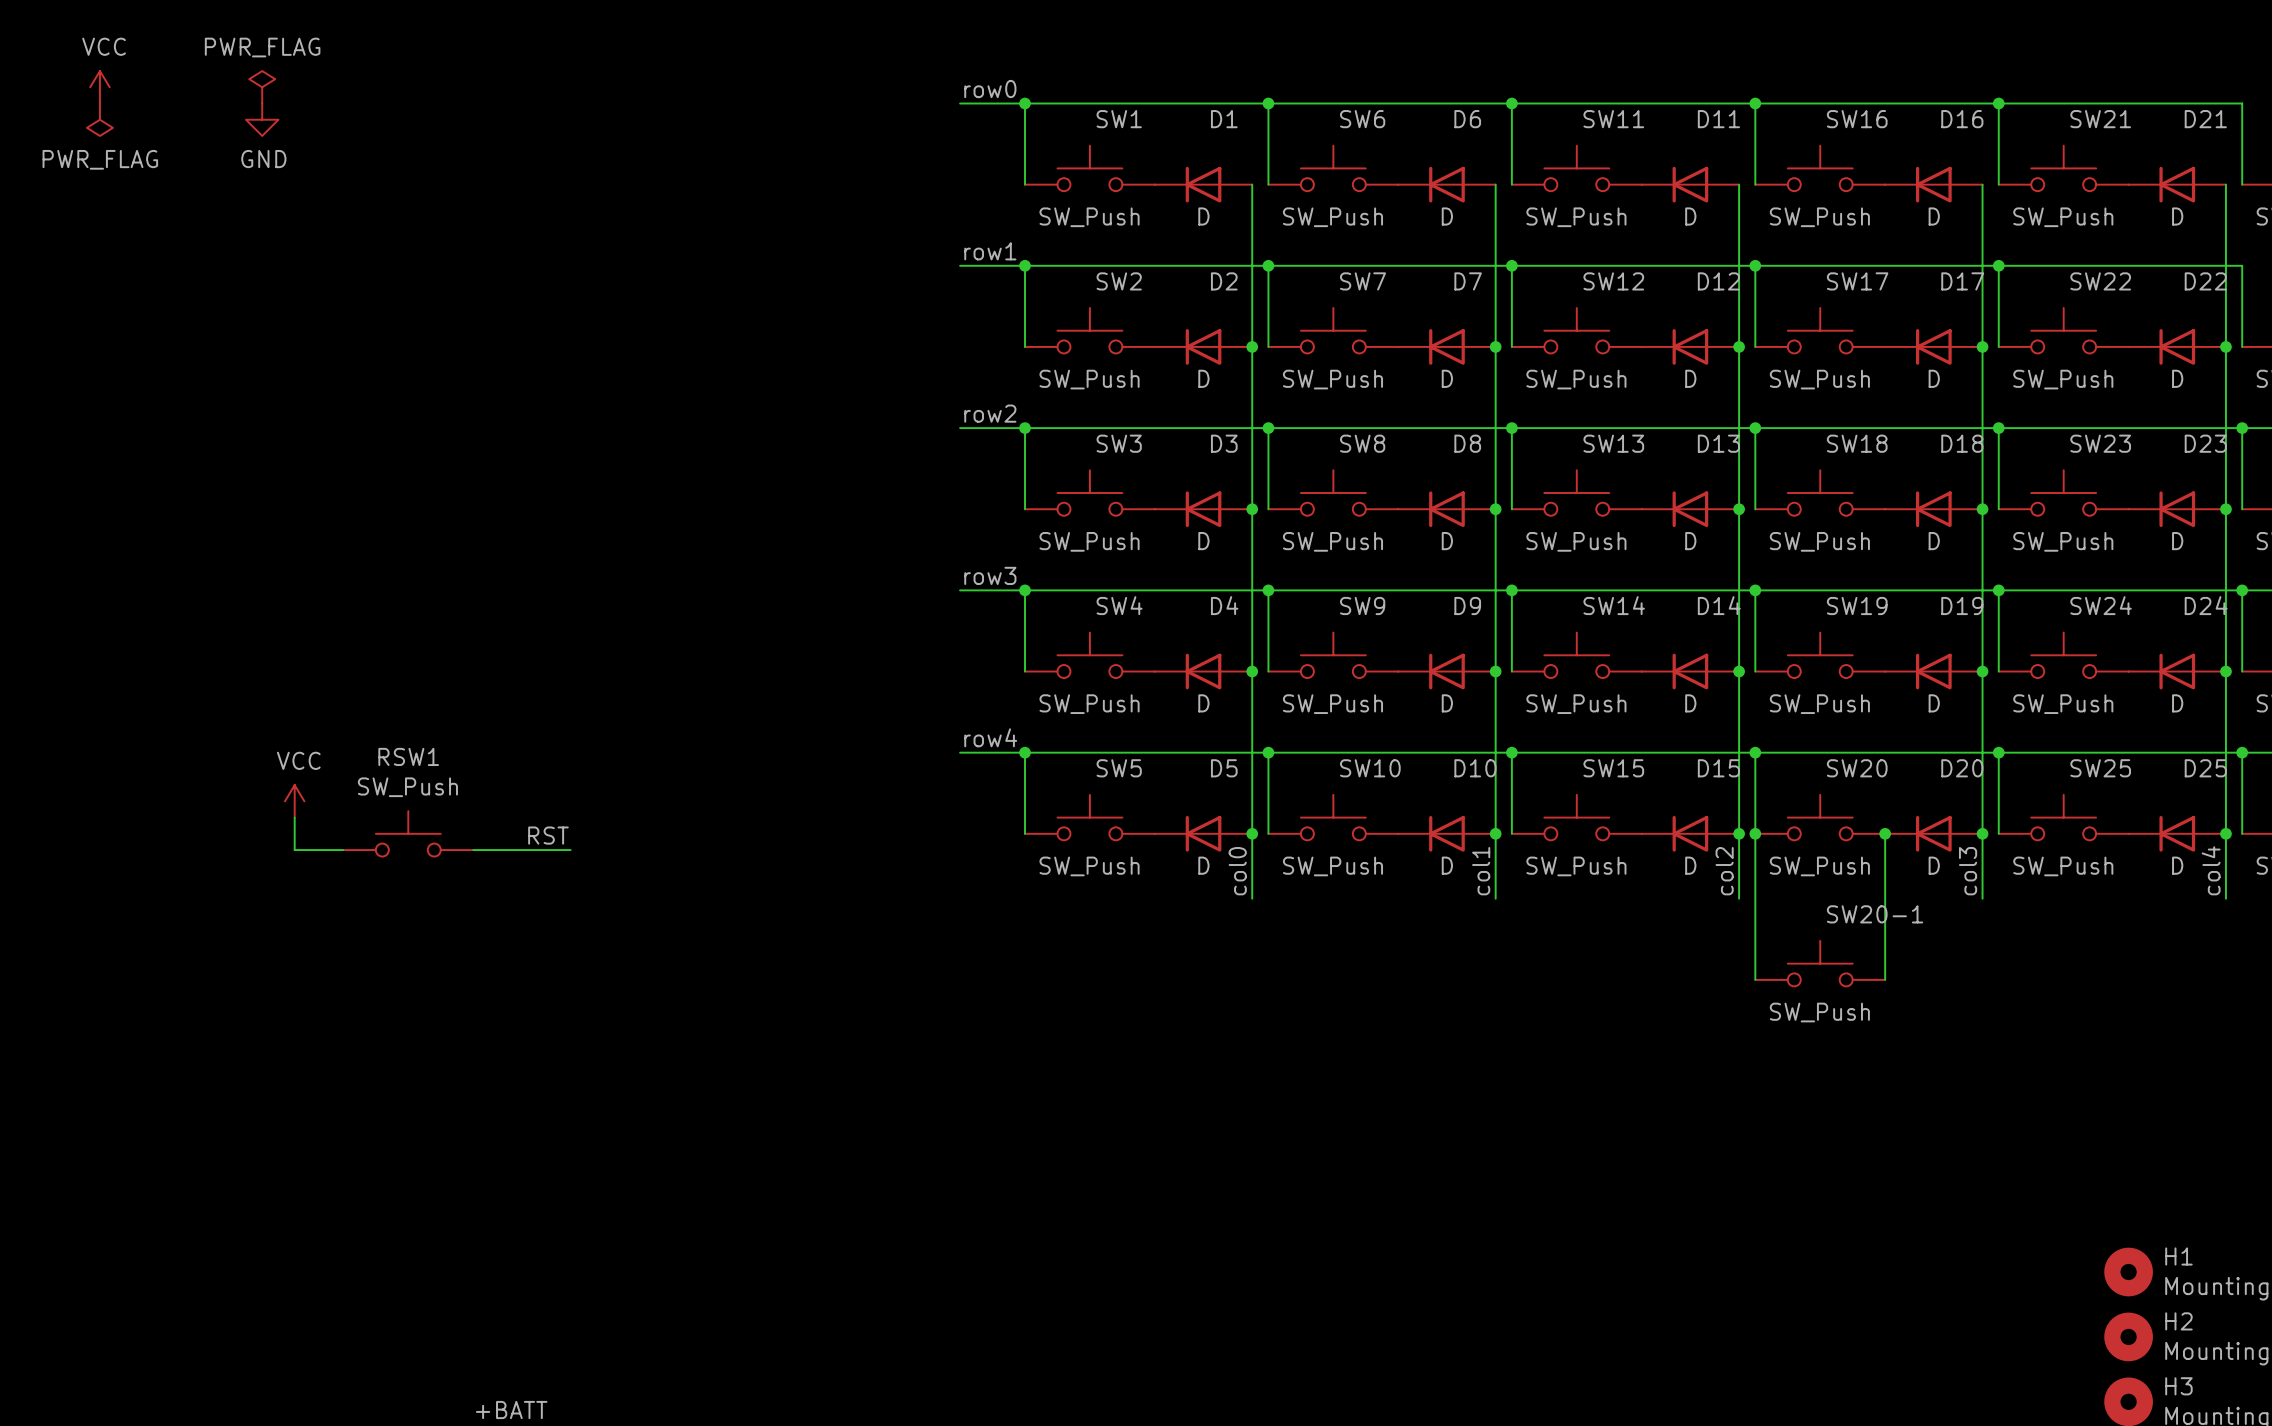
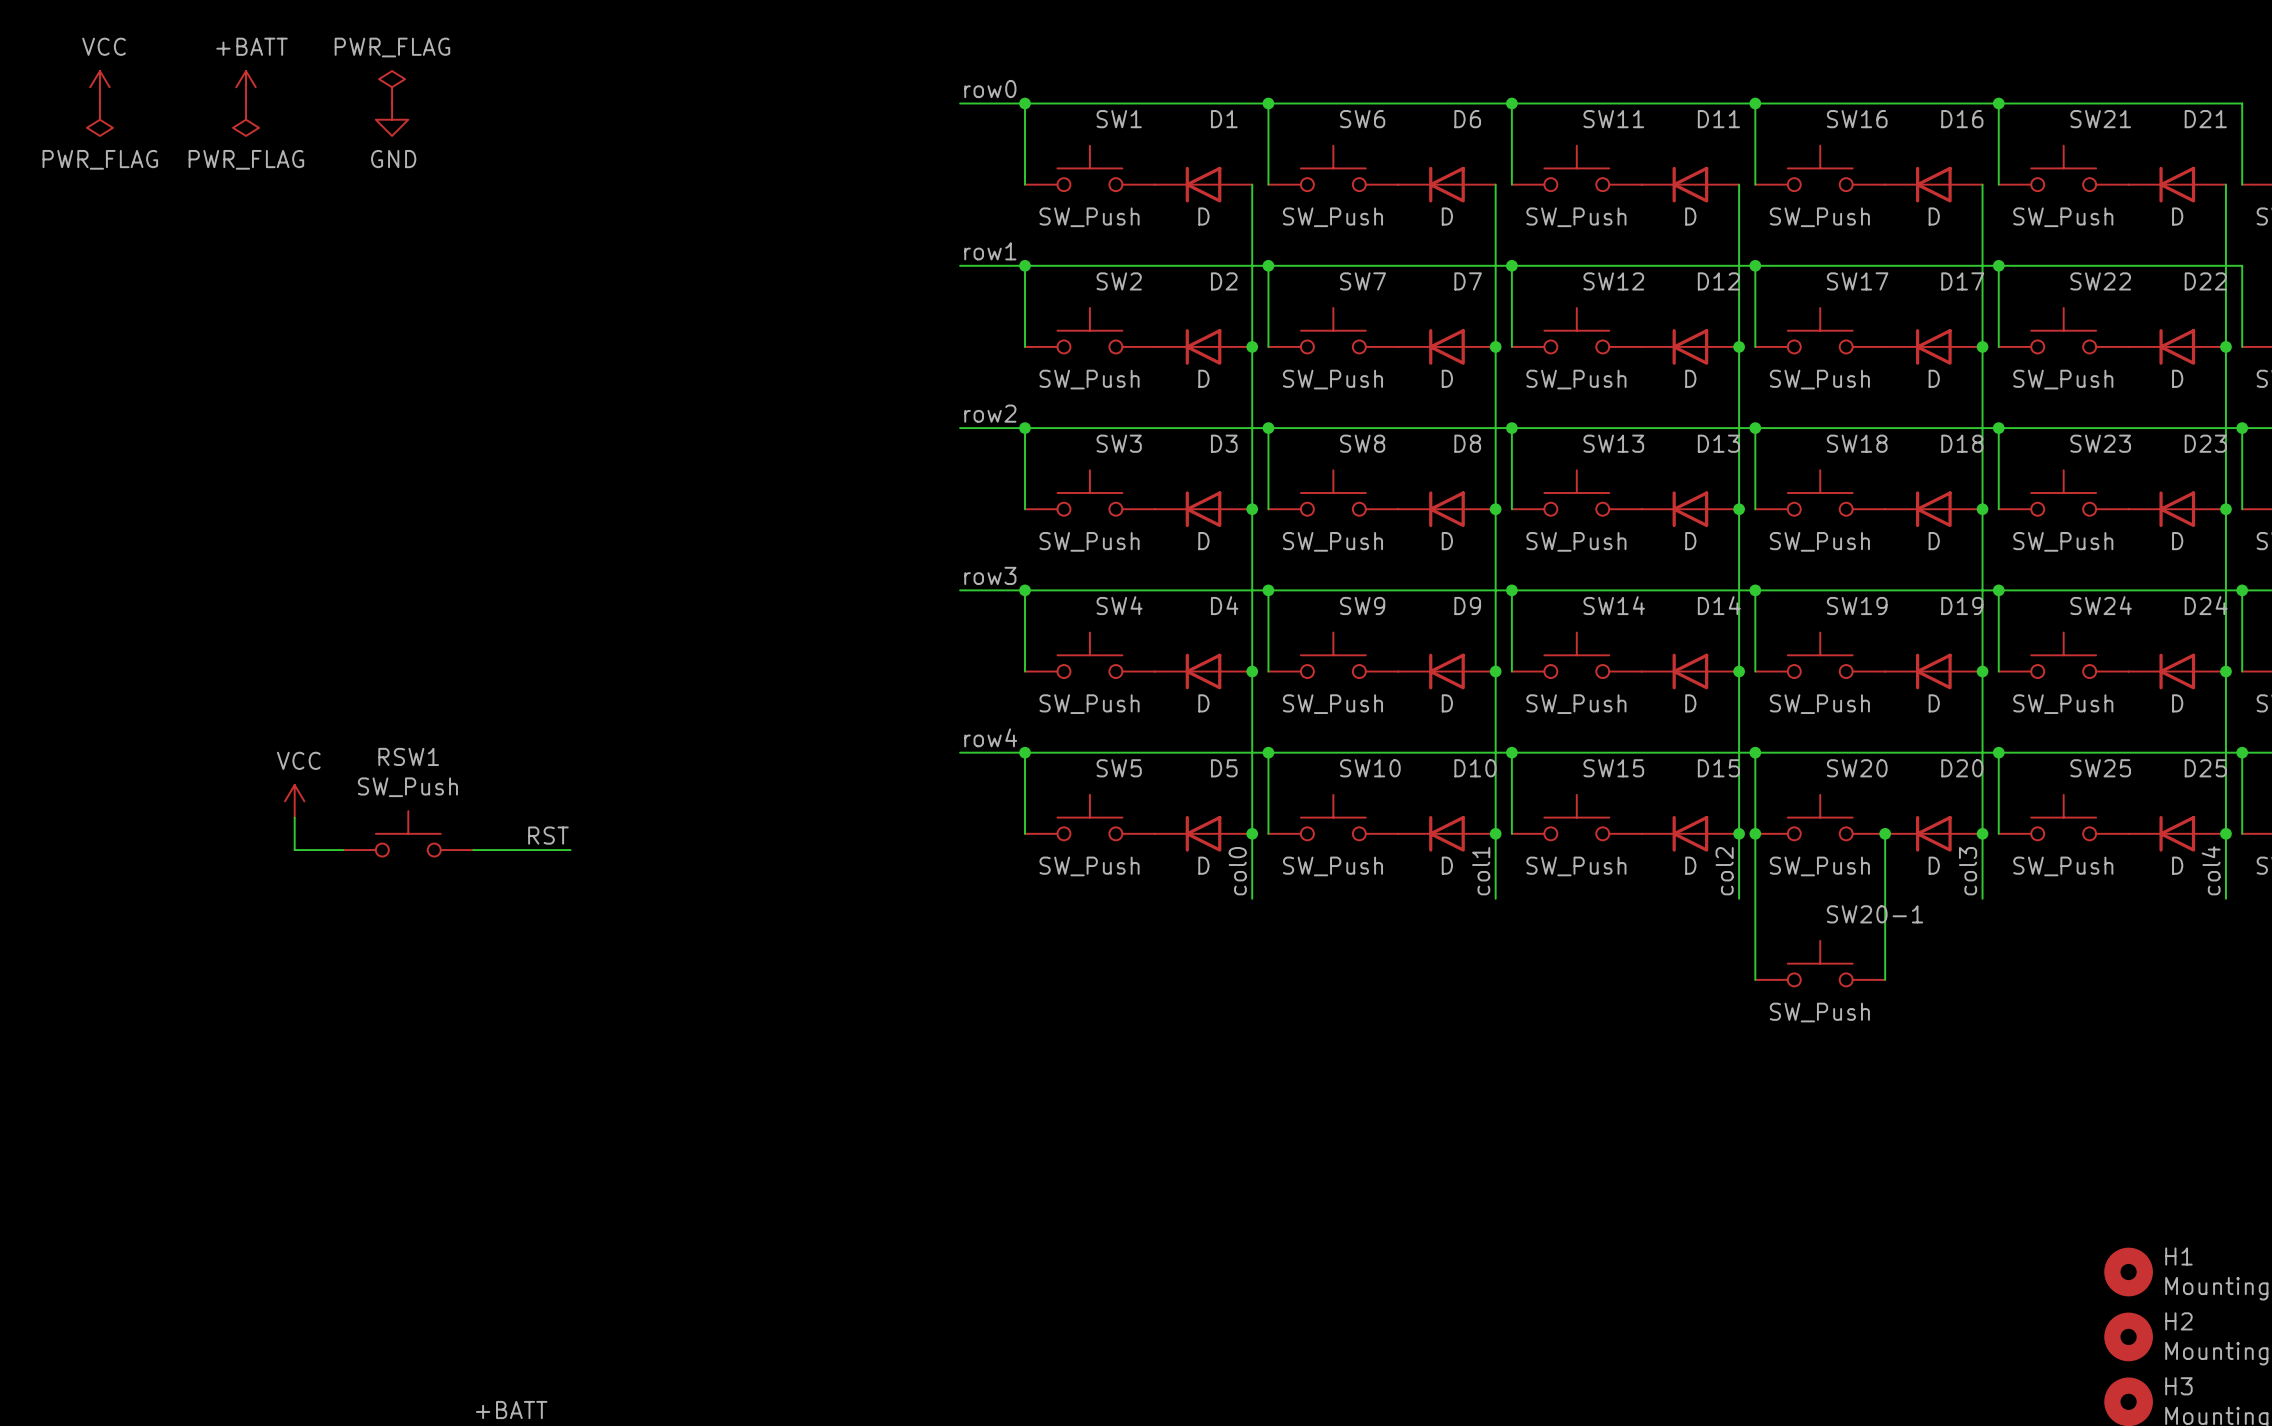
power symbol: none -> +BATT (246, 87)
power symbol rotation: 0° (262, 87) -> 180° (246, 119)
power symbol position: PWR_FLAG (262, 87) -> PWR_FLAG (246, 119)
power symbol: none -> PWR_FLAG (392, 87)
power symbol position: GND (262, 119) -> GND (392, 119)

